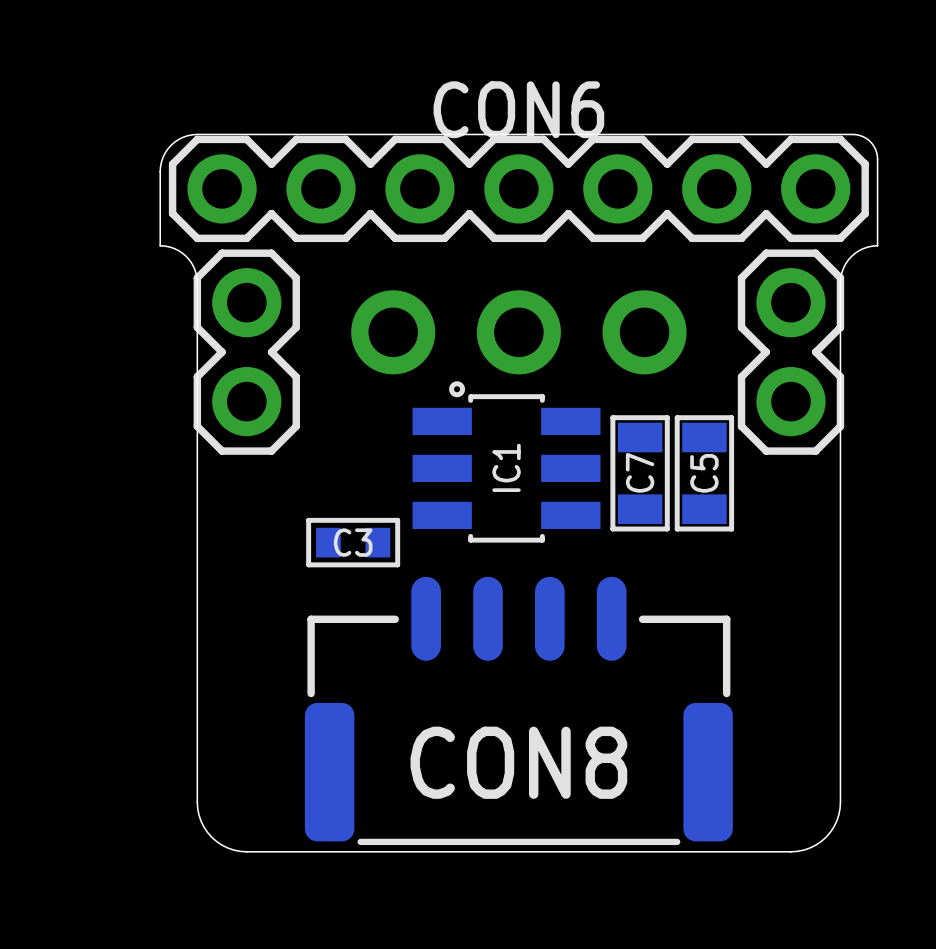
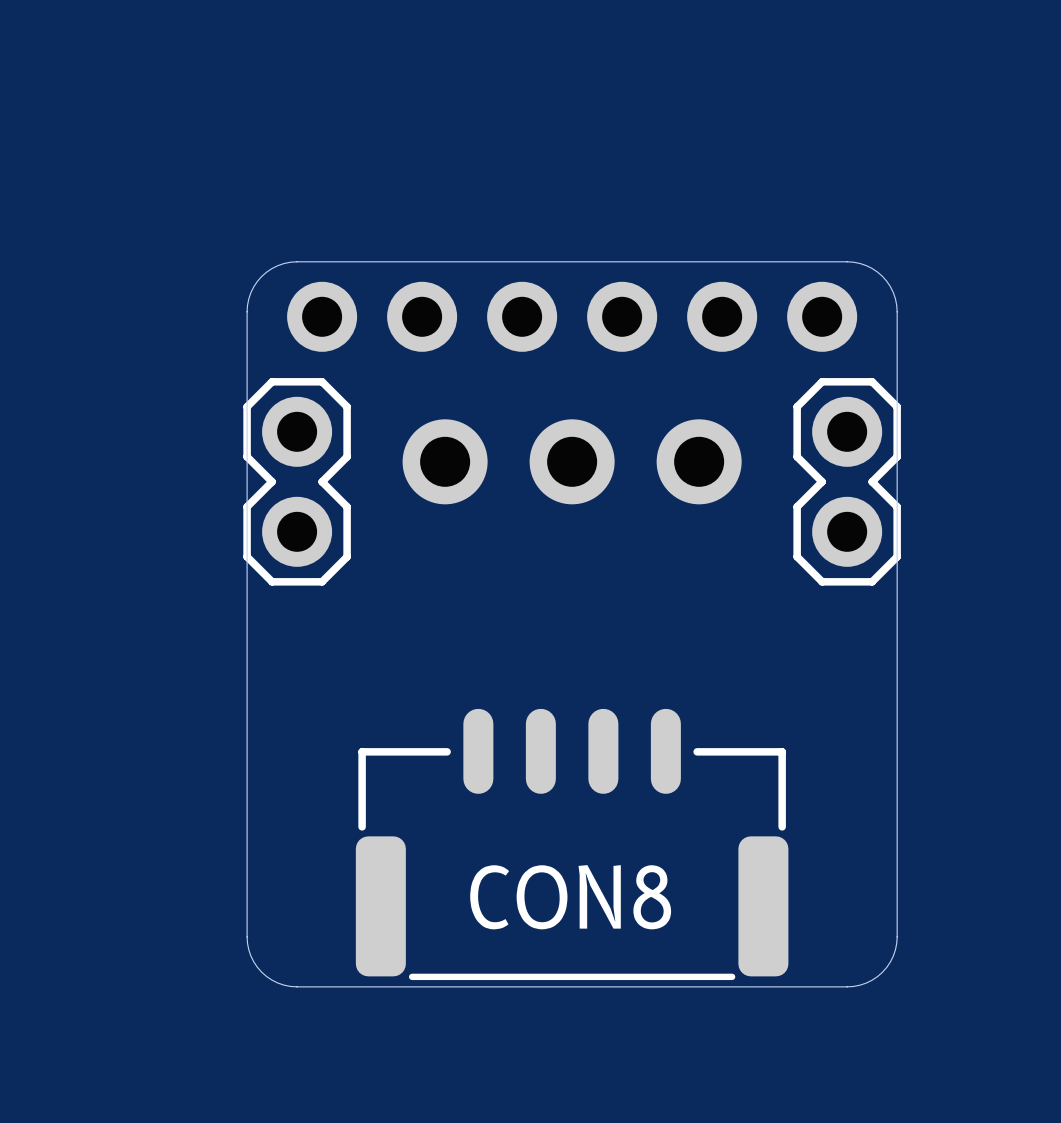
board edge: (246, 134) (187, 135) (171, 145) (161, 161) (160, 245) (174, 248) (186, 256) (194, 268) (197, 282) -> (297, 261) (277, 265) (266, 272) (257, 281) (248, 298) (247, 311) (247, 411)
board edge: (790, 134) (859, 135) (870, 141) (876, 152) (877, 245) (863, 248) (851, 256) (843, 268) (840, 282) -> (847, 261) (866, 265) (877, 272) (886, 281) (895, 298) (897, 311) (897, 411)
CON6: (518, 188) -> none
part: none -> (572, 316)
IC1: (506, 461) -> none
C7: (640, 473) -> none
C5: (704, 473) -> none
C3: (353, 542) -> none

